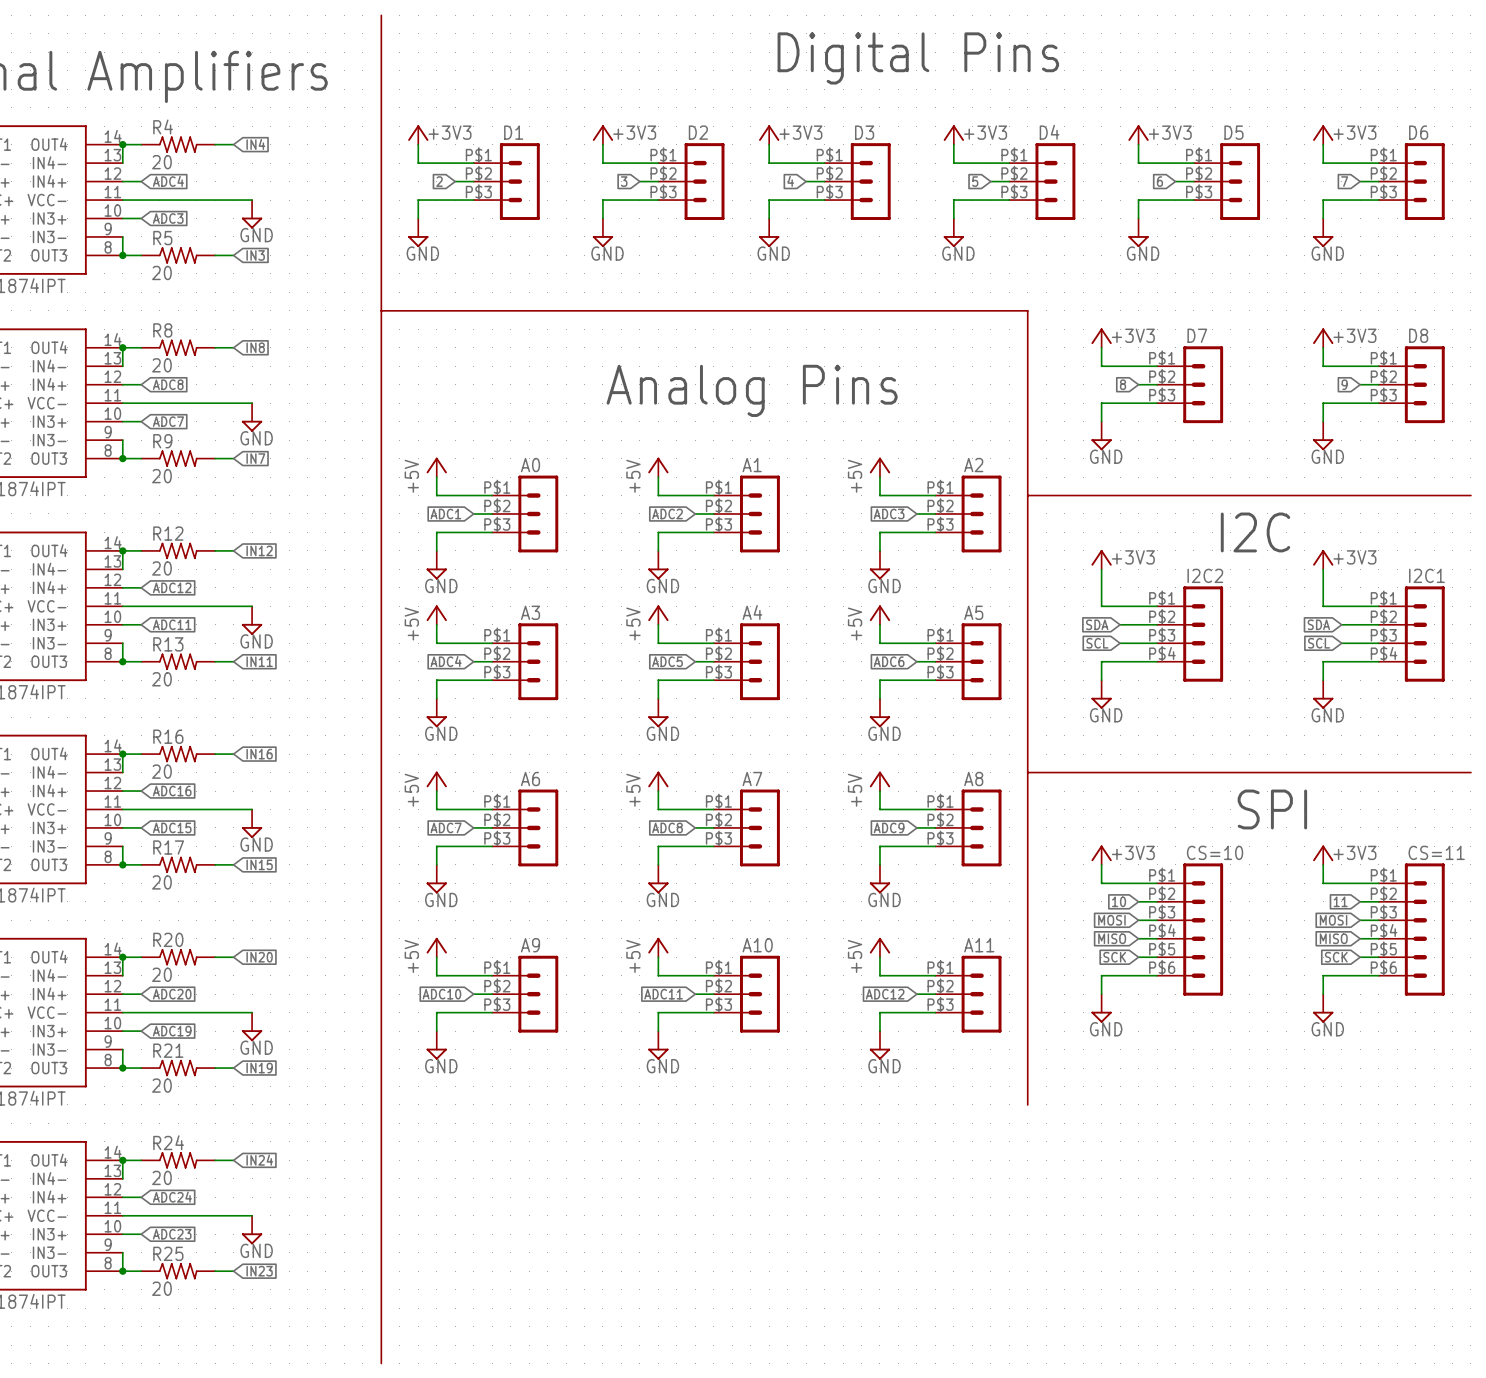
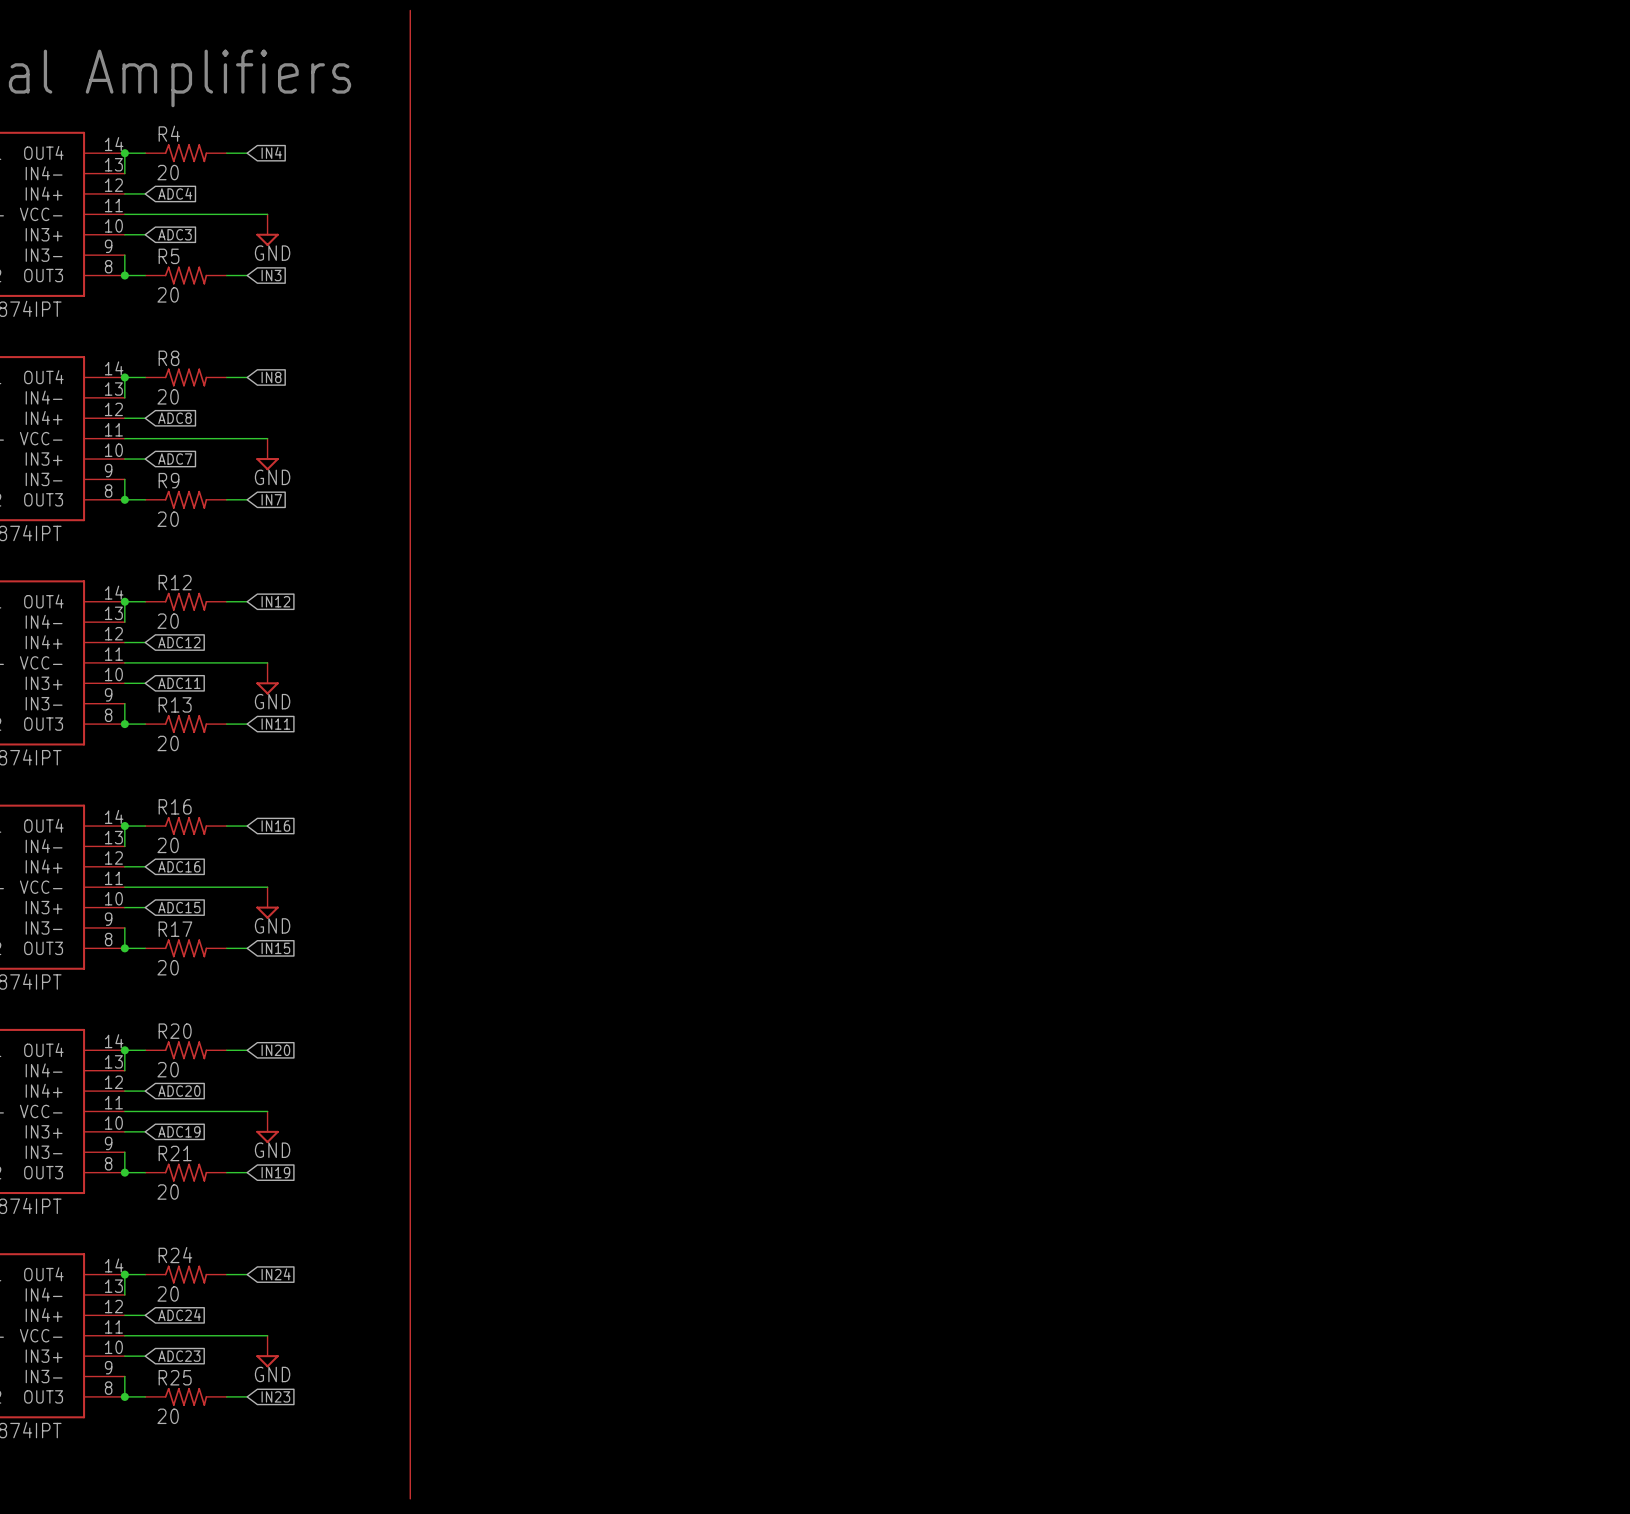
text: Digital Pins (918, 58) -> none
power symbol: +3V3 (418, 134) -> none
power symbol: +3V3 (602, 134) -> none
power symbol: +3V3 (769, 134) -> none
power symbol: +3V3 (953, 134) -> none
power symbol: +3V3 (1138, 134) -> none
power symbol: +3V3 (1323, 134) -> none
wire: (418, 144) (418, 163) (473, 163) -> none
wire: (602, 144) (602, 163) (658, 163) -> none
wire: (769, 144) (769, 163) (824, 163) -> none
wire: (953, 144) (953, 163) (1009, 163) -> none
wire: (1138, 144) (1138, 163) (1193, 163) -> none
wire: (1323, 144) (1323, 163) (1378, 163) -> none
global label: 2 (439, 181) -> none
wire: (455, 181) (473, 181) -> none
D1: (506, 181) -> none
global label: 3 (624, 181) -> none
wire: (639, 181) (658, 181) -> none
D2: (691, 181) -> none
global label: 4 (790, 181) -> none
wire: (806, 181) (824, 181) -> none
D3: (857, 181) -> none
global label: 5 (975, 181) -> none
wire: (990, 181) (1009, 181) -> none
D4: (1042, 181) -> none
global label: 6 (1159, 181) -> none
wire: (1175, 181) (1193, 181) -> none
D5: (1227, 181) -> none
global label: 7 (1344, 181) -> none
wire: (1360, 181) (1378, 181) -> none
D6: (1411, 181) -> none
wire: (473, 200) (418, 200) (418, 218) -> none
wire: (658, 200) (602, 200) (602, 218) -> none
wire: (824, 200) (769, 200) (769, 218) -> none
wire: (1009, 200) (953, 200) (953, 218) -> none
wire: (1193, 200) (1138, 200) (1138, 218) -> none
wire: (1378, 200) (1323, 200) (1323, 218) -> none
power symbol: GND (418, 232) -> none
power symbol: GND (602, 232) -> none
power symbol: GND (769, 232) -> none
power symbol: GND (953, 232) -> none
power symbol: GND (1138, 232) -> none
power symbol: GND (1323, 232) -> none
line: (381, 310) (1027, 310) (1027, 1104) -> none
power symbol: +3V3 (1101, 338) -> none
power symbol: +3V3 (1323, 338) -> none
wire: (1101, 347) (1101, 366) (1157, 366) -> none
wire: (1323, 347) (1323, 366) (1378, 366) -> none
global label: 8 (1123, 384) -> none
wire: (1138, 384) (1157, 384) -> none
D7: (1190, 384) -> none
global label: 9 (1344, 384) -> none
wire: (1360, 384) (1378, 384) -> none
D8: (1411, 384) -> none
text: Analog Pins (752, 390) -> none
wire: (1157, 403) (1101, 403) (1101, 421) -> none
wire: (1378, 403) (1323, 403) (1323, 421) -> none
power symbol: GND (1101, 435) -> none
power symbol: GND (1323, 435) -> none
power symbol: +5V (436, 467) -> none
power symbol: +5V (658, 467) -> none
power symbol: +5V (879, 467) -> none
wire: (436, 477) (436, 495) (492, 495) -> none
wire: (658, 477) (658, 495) (713, 495) -> none
wire: (879, 477) (879, 495) (935, 495) -> none
line: (1027, 495) (1470, 495) -> none
global label: ADC1 (445, 513) -> none
wire: (473, 513) (492, 513) -> none
A0: (525, 513) -> none
global label: ADC2 (667, 513) -> none
wire: (695, 513) (713, 513) -> none
A1: (746, 513) -> none
global label: ADC3 (889, 513) -> none
wire: (916, 513) (935, 513) -> none
A2: (968, 513) -> none
wire: (492, 532) (436, 532) (436, 550) -> none
wire: (713, 532) (658, 532) (658, 550) -> none
wire: (935, 532) (879, 532) (879, 550) -> none
text: I2C (1255, 532) -> none
power symbol: +3V3 (1101, 559) -> none
power symbol: +3V3 (1323, 559) -> none
power symbol: GND (436, 565) -> none
power symbol: GND (658, 565) -> none
power symbol: GND (879, 565) -> none
wire: (1101, 569) (1101, 606) (1157, 606) -> none
wire: (1323, 569) (1323, 606) (1378, 606) -> none
power symbol: +5V (436, 615) -> none
power symbol: +5V (658, 615) -> none
power symbol: +5V (879, 615) -> none
wire: (436, 624) (436, 643) (492, 643) -> none
wire: (658, 624) (658, 643) (713, 643) -> none
wire: (879, 624) (879, 643) (935, 643) -> none
global label: SDA (1097, 624) -> none
wire: (1120, 624) (1157, 624) -> none
global label: SDA (1318, 624) -> none
wire: (1341, 624) (1378, 624) -> none
I2C2: (1190, 634) -> none
I2C1: (1411, 634) -> none
global label: SCL (1097, 643) -> none
wire: (1120, 643) (1157, 643) -> none
global label: SCL (1319, 643) -> none
wire: (1341, 643) (1378, 643) -> none
global label: ADC4 (446, 661) -> none
wire: (473, 661) (492, 661) -> none
A3: (525, 661) -> none
global label: ADC5 (667, 661) -> none
wire: (695, 661) (713, 661) -> none
A4: (746, 661) -> none
global label: ADC6 (889, 661) -> none
wire: (916, 661) (935, 661) -> none
A5: (968, 661) -> none
wire: (1157, 661) (1101, 661) (1101, 680) -> none
wire: (1378, 661) (1323, 661) (1323, 680) -> none
wire: (492, 680) (436, 680) (436, 698) -> none
wire: (713, 680) (658, 680) (658, 698) -> none
wire: (935, 680) (879, 680) (879, 698) -> none
power symbol: GND (1101, 694) -> none
power symbol: GND (1323, 694) -> none
power symbol: GND (436, 712) -> none
power symbol: GND (658, 712) -> none
power symbol: GND (879, 712) -> none
line: (1027, 772) (1470, 772) -> none
power symbol: +5V (436, 781) -> none
power symbol: +5V (658, 781) -> none
power symbol: +5V (879, 781) -> none
wire: (436, 791) (436, 809) (492, 809) -> none
wire: (658, 791) (658, 809) (713, 809) -> none
wire: (879, 791) (879, 809) (935, 809) -> none
text: SPI (1272, 809) -> none
global label: ADC7 (446, 827) -> none
wire: (473, 827) (492, 827) -> none
A6: (525, 827) -> none
global label: ADC8 (667, 827) -> none
wire: (695, 827) (713, 827) -> none
A7: (746, 827) -> none
global label: ADC9 (889, 827) -> none
wire: (916, 827) (935, 827) -> none
A8: (968, 827) -> none
wire: (492, 846) (436, 846) (436, 864) -> none
wire: (713, 846) (658, 846) (658, 864) -> none
wire: (935, 846) (879, 846) (879, 864) -> none
power symbol: +3V3 (1101, 855) -> none
power symbol: +3V3 (1323, 855) -> none
wire: (1101, 864) (1101, 883) (1157, 883) -> none
wire: (1323, 864) (1323, 883) (1378, 883) -> none
power symbol: GND (436, 879) -> none
power symbol: GND (658, 879) -> none
power symbol: GND (879, 879) -> none
global label: 10 (1119, 901) -> none
wire: (1138, 901) (1157, 901) -> none
global label: 11 (1340, 901) -> none
wire: (1360, 901) (1378, 901) -> none
global label: MOSI (1111, 920) -> none
wire: (1138, 920) (1157, 920) -> none
global label: MOSI (1333, 920) -> none
wire: (1360, 920) (1378, 920) -> none
CS=10: (1190, 929) -> none
CS=11: (1411, 929) -> none
global label: MISO (1112, 938) -> none
wire: (1138, 938) (1157, 938) -> none
global label: MISO (1333, 938) -> none
wire: (1360, 938) (1378, 938) -> none
power symbol: +5V (436, 947) -> none
power symbol: +5V (658, 947) -> none
power symbol: +5V (879, 947) -> none
wire: (436, 957) (436, 975) (492, 975) -> none
wire: (658, 957) (658, 975) (713, 975) -> none
wire: (879, 957) (879, 975) (935, 975) -> none
global label: SCK (1114, 957) -> none
wire: (1138, 957) (1157, 957) -> none
global label: SCK (1336, 957) -> none
wire: (1360, 957) (1378, 957) -> none
wire: (1157, 975) (1101, 975) (1101, 994) -> none
wire: (1378, 975) (1323, 975) (1323, 994) -> none
global label: ADC10 (441, 994) -> none
wire: (473, 994) (492, 994) -> none
A9: (525, 994) -> none
global label: ADC11 (663, 994) -> none
wire: (695, 994) (713, 994) -> none
A10: (746, 994) -> none
global label: ADC12 (885, 994) -> none
wire: (916, 994) (935, 994) -> none
A11: (968, 994) -> none
power symbol: GND (1101, 1008) -> none
power symbol: GND (1323, 1008) -> none
wire: (492, 1012) (436, 1012) (436, 1031) -> none
wire: (713, 1012) (658, 1012) (658, 1031) -> none
wire: (935, 1012) (879, 1012) (879, 1031) -> none
power symbol: GND (436, 1045) -> none
power symbol: GND (658, 1045) -> none
power symbol: GND (879, 1045) -> none

